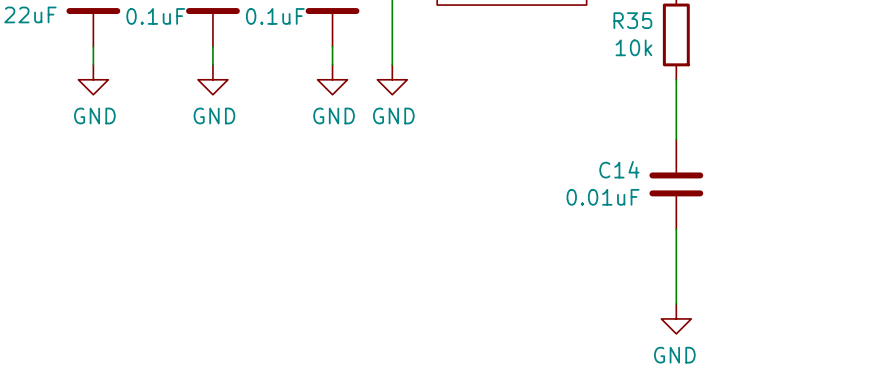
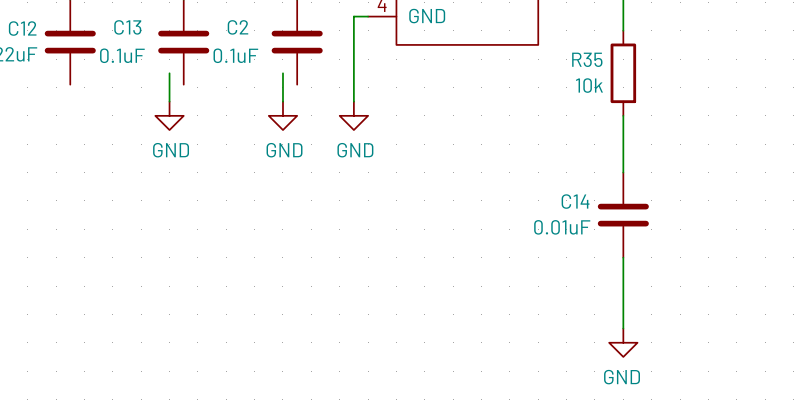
wire: none -> (169, 73) (169, 101)
wire: none -> (282, 73) (282, 101)
wire: (93, 46) (93, 64) -> none
wire: (212, 46) (212, 64) -> none
wire: (332, 46) (332, 64) -> none
power symbol: GND (93, 79) -> none
power symbol position: GND (212, 79) -> GND (169, 115)
power symbol position: GND (332, 79) -> GND (282, 115)

